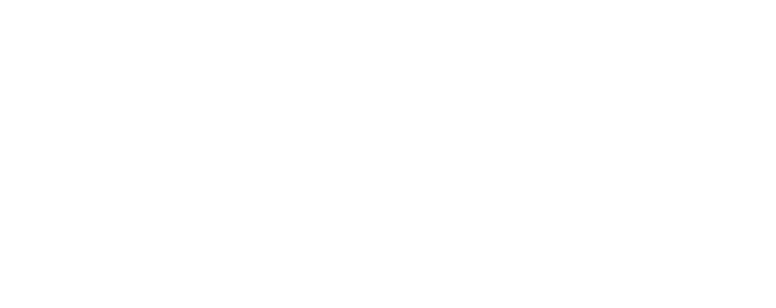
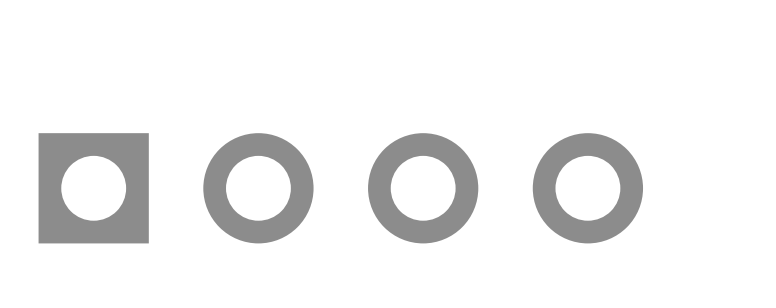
part: none -> (340, 188)

